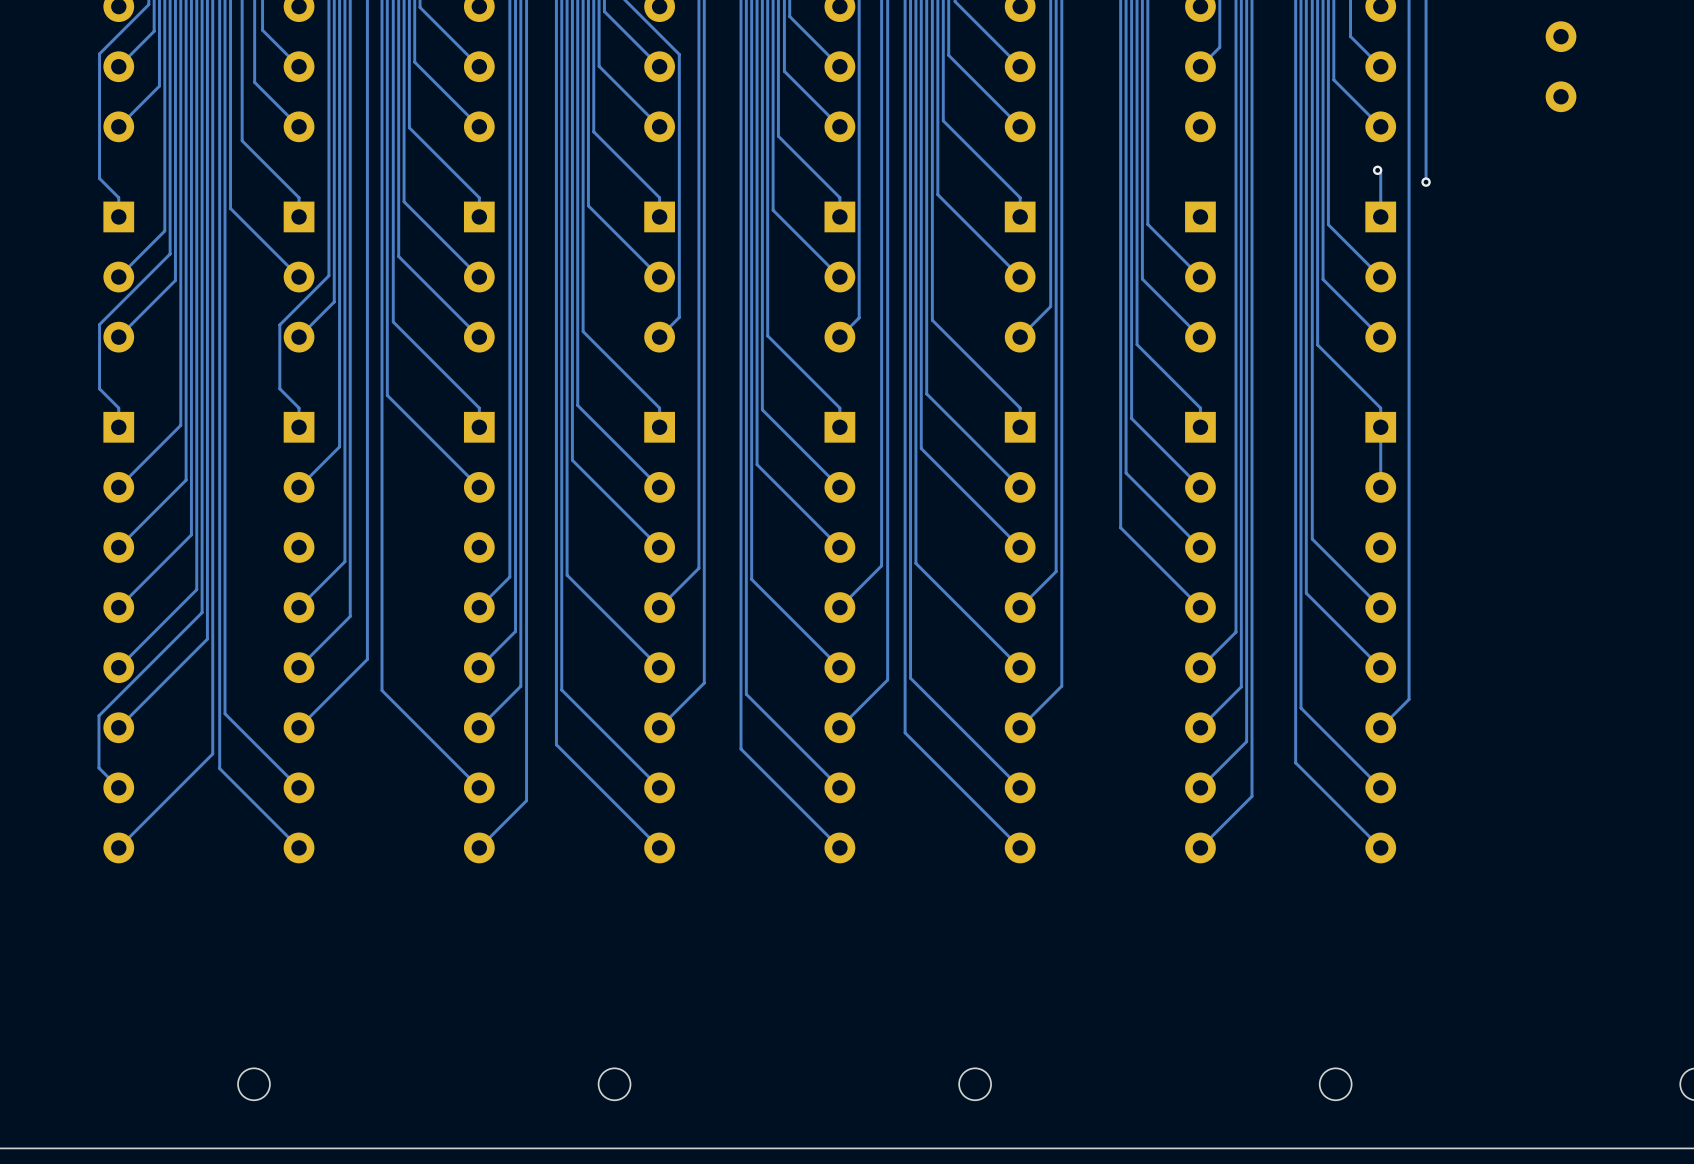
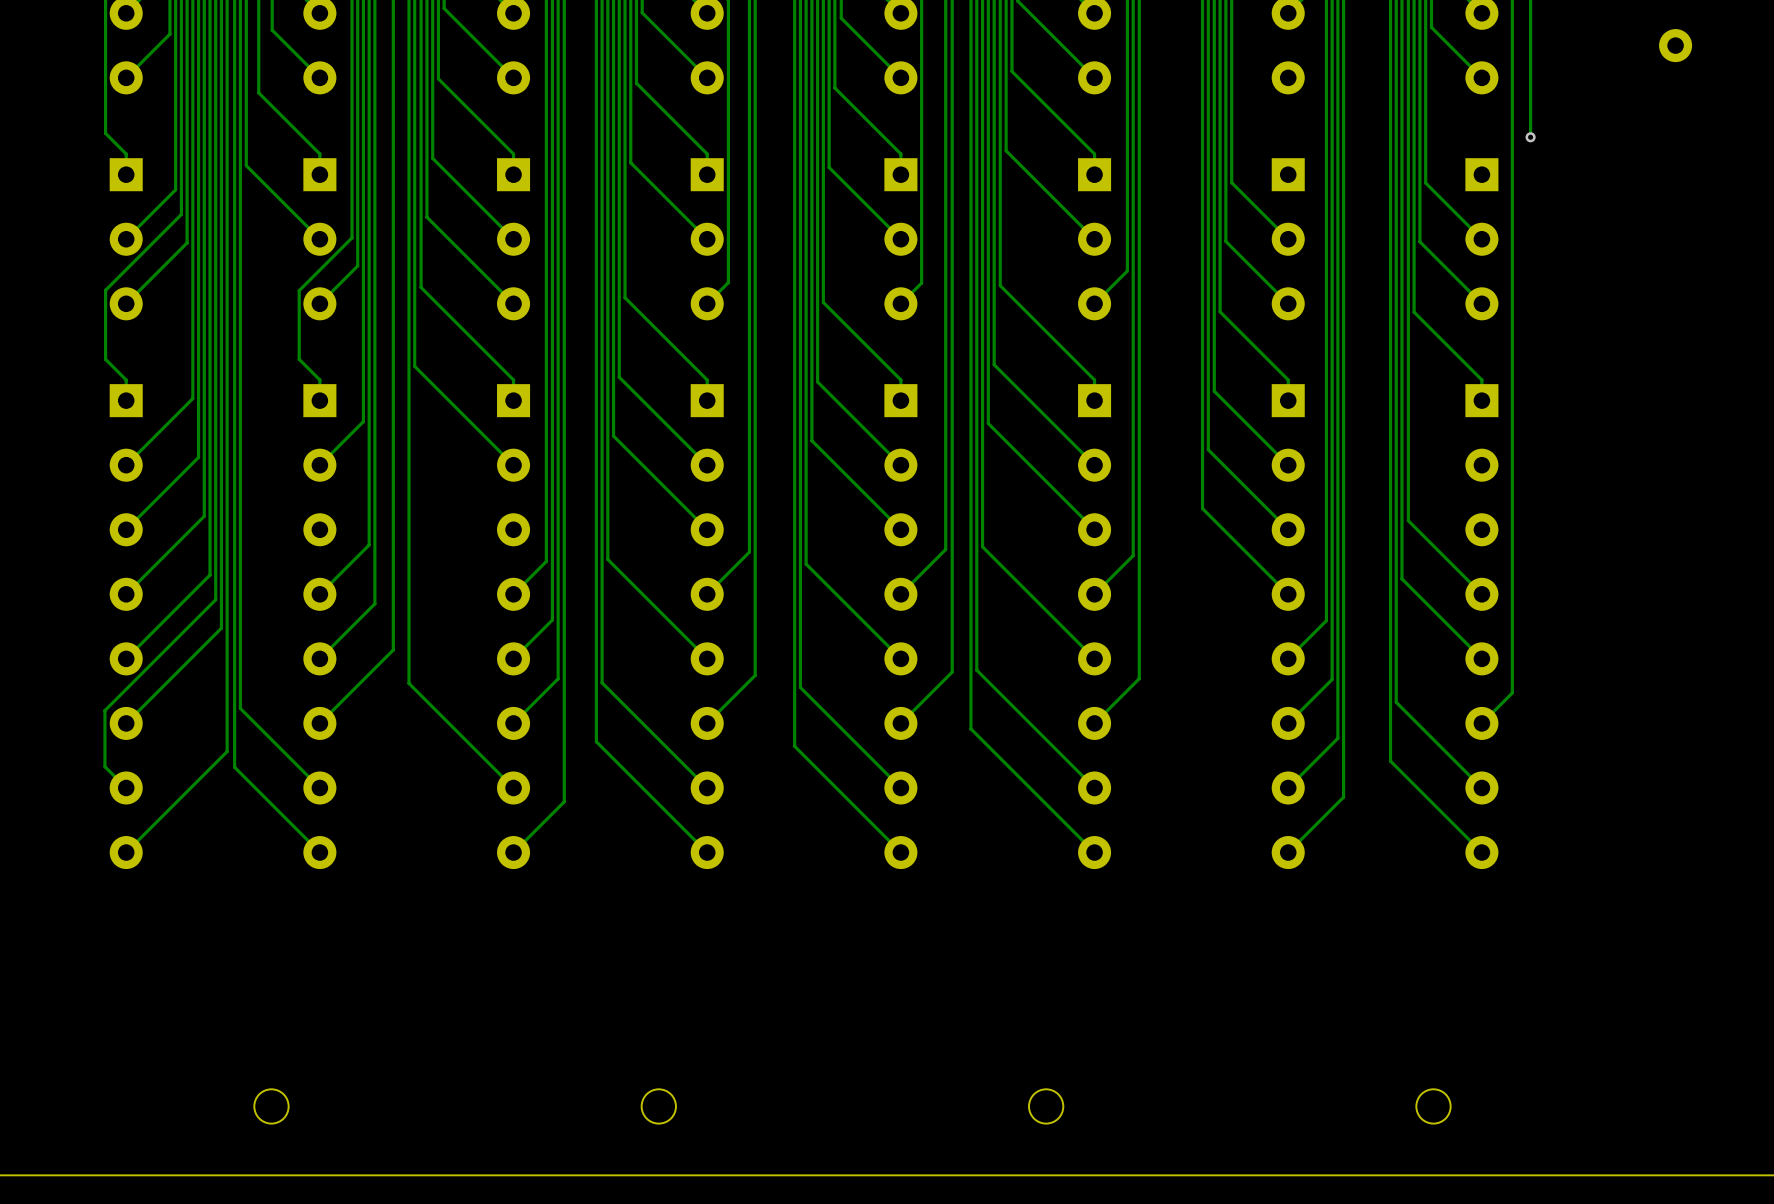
track: (1377, 170) (1380, 173) (1380, 216) -> none
via: (1377, 170) -> none
track: (1380, 427) (1380, 487) -> none

